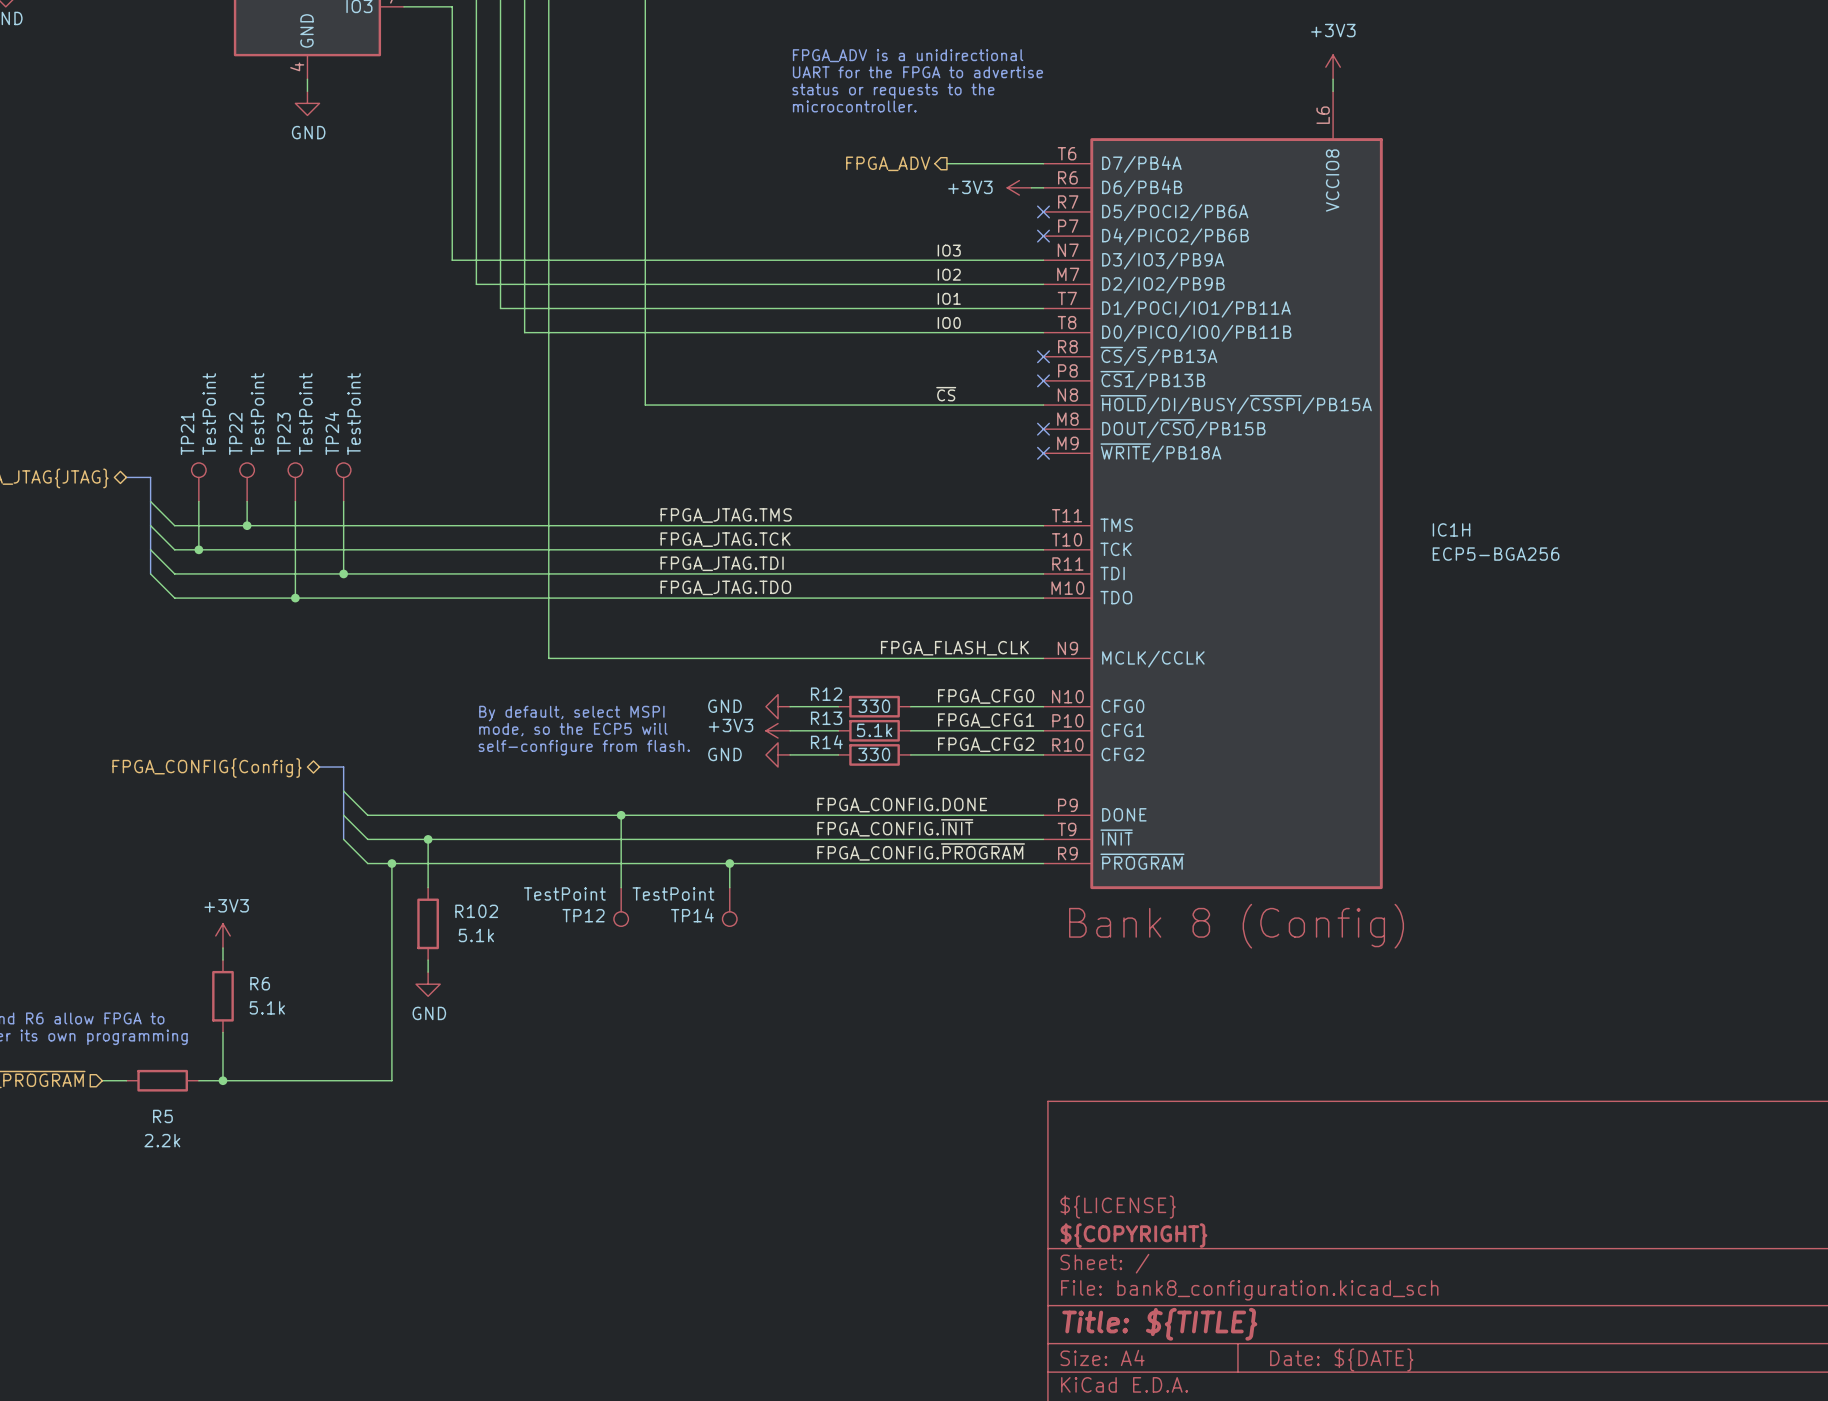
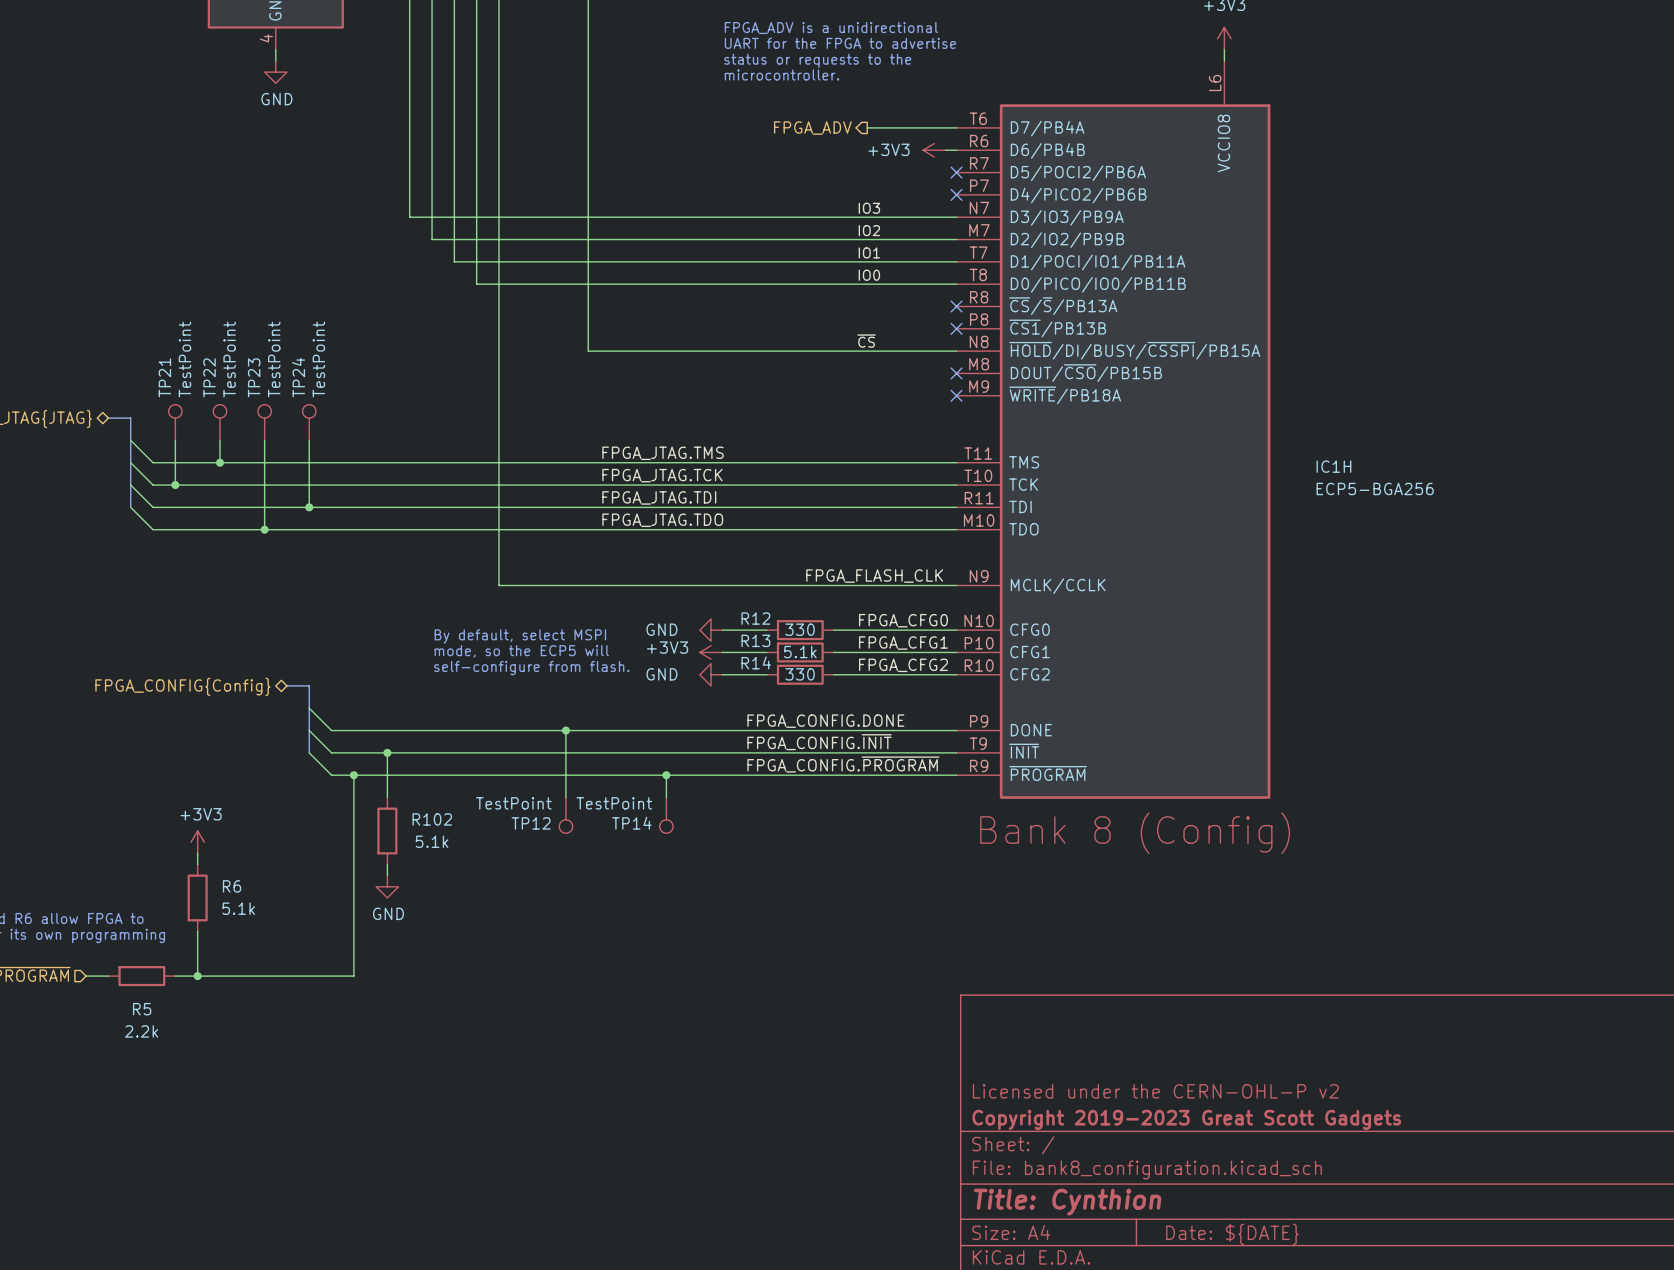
title block: ${LICENSE} (1118, 1207) -> Licensed under the CERN-OHL-P v2 (1155, 1091)
title block: ${COPYRIGHT} (1133, 1235) -> Copyright 2019-2023 Great Scott Gadgets (1186, 1119)
title block: Title: ${TITLE} (1159, 1324) -> Title: Cynthion (1067, 1202)

